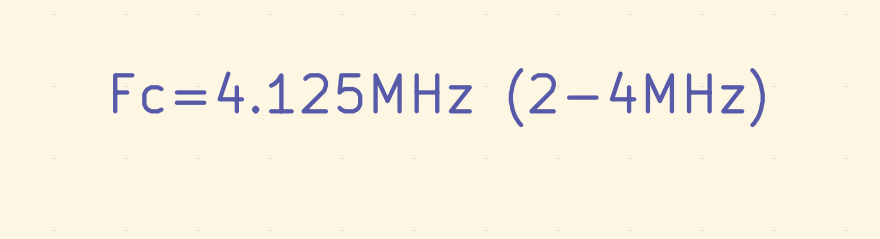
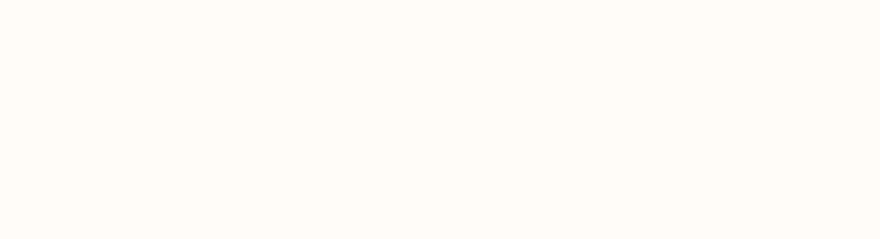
text: Fc=4.125MHz (2-4MHz) (438, 97) -> none

